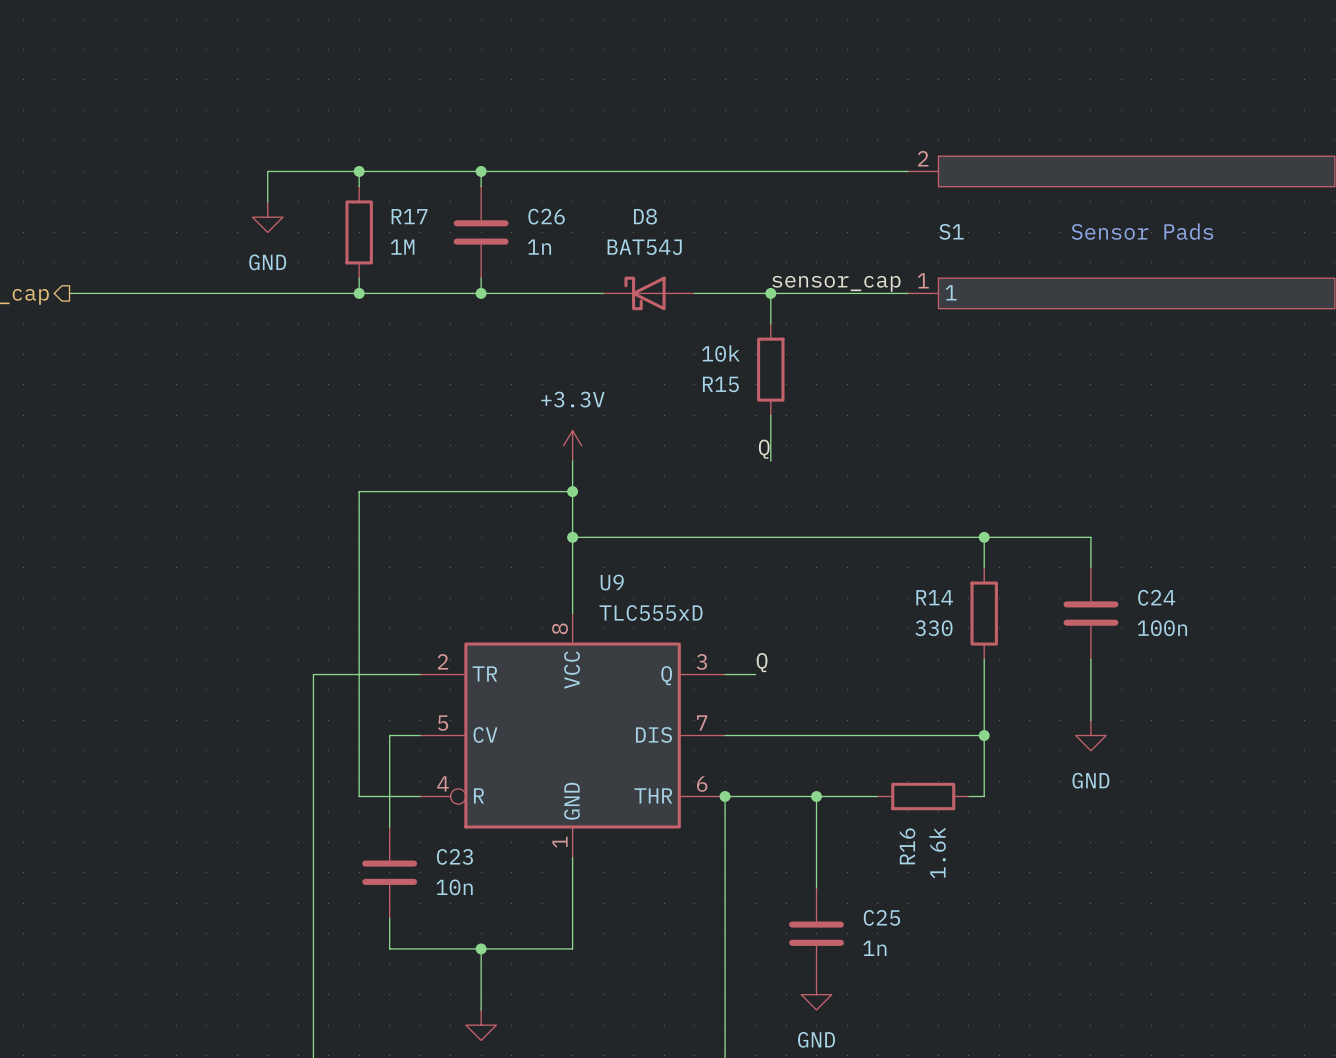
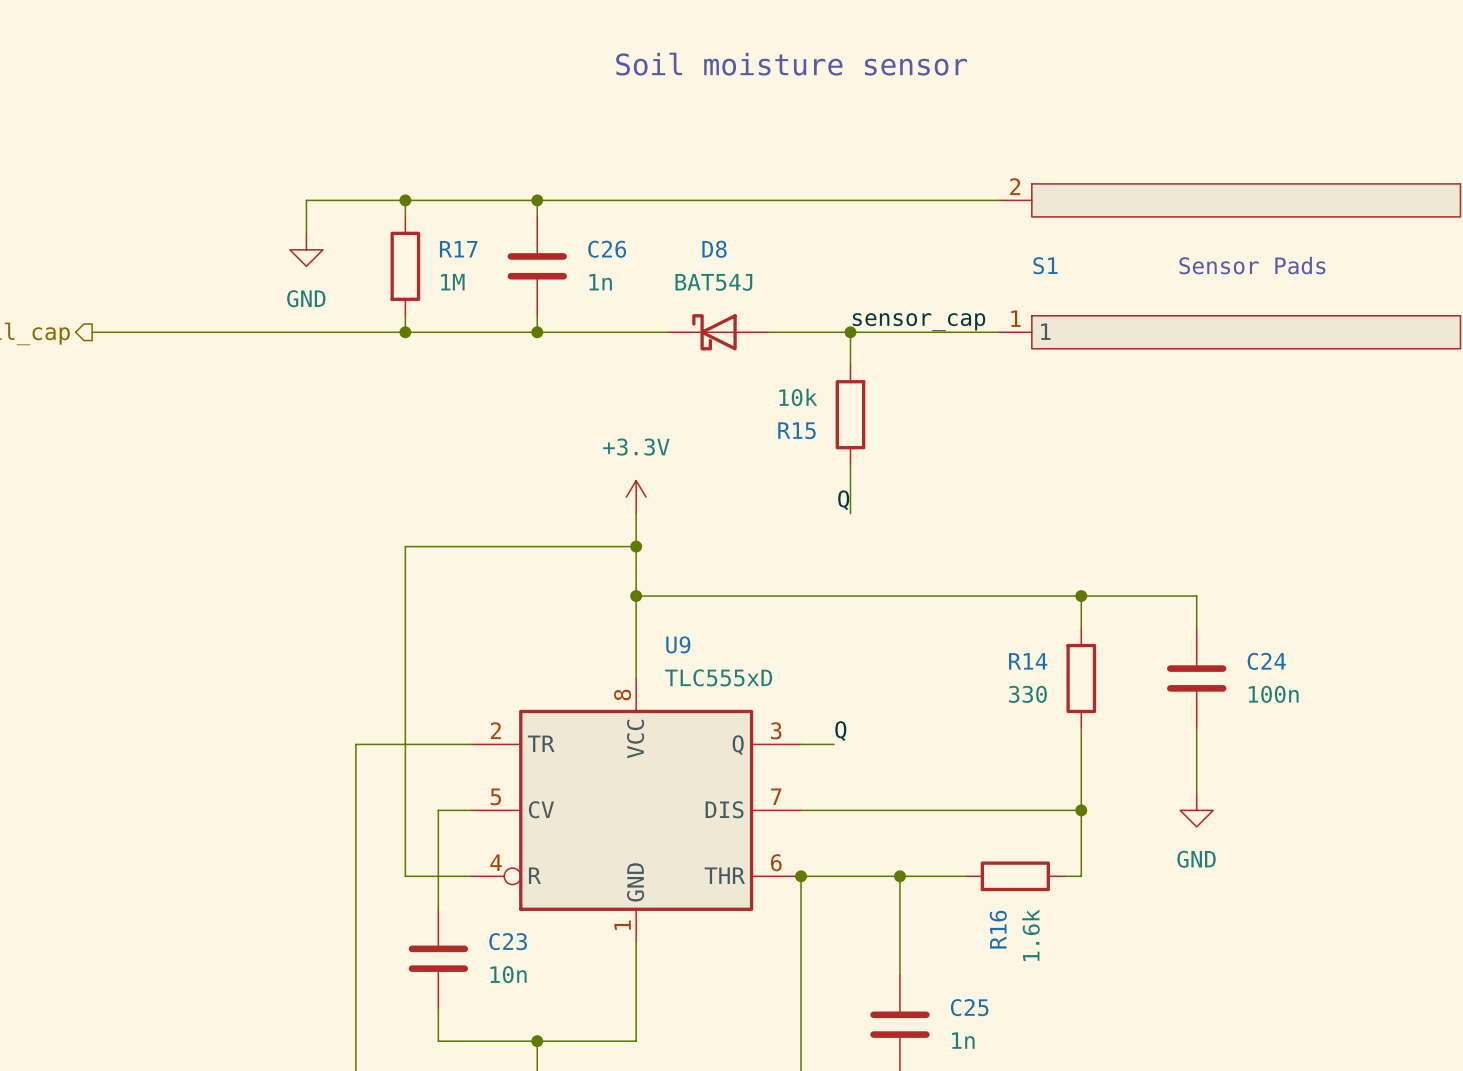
text: none -> Soil moisture sensor (791, 64)

